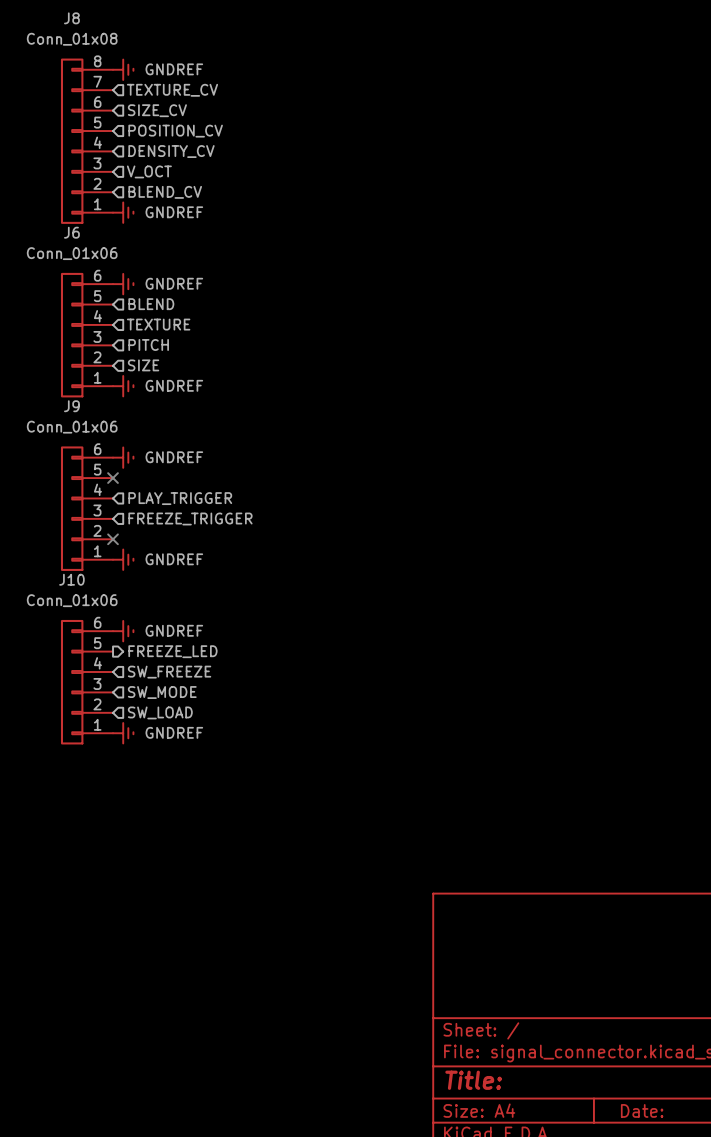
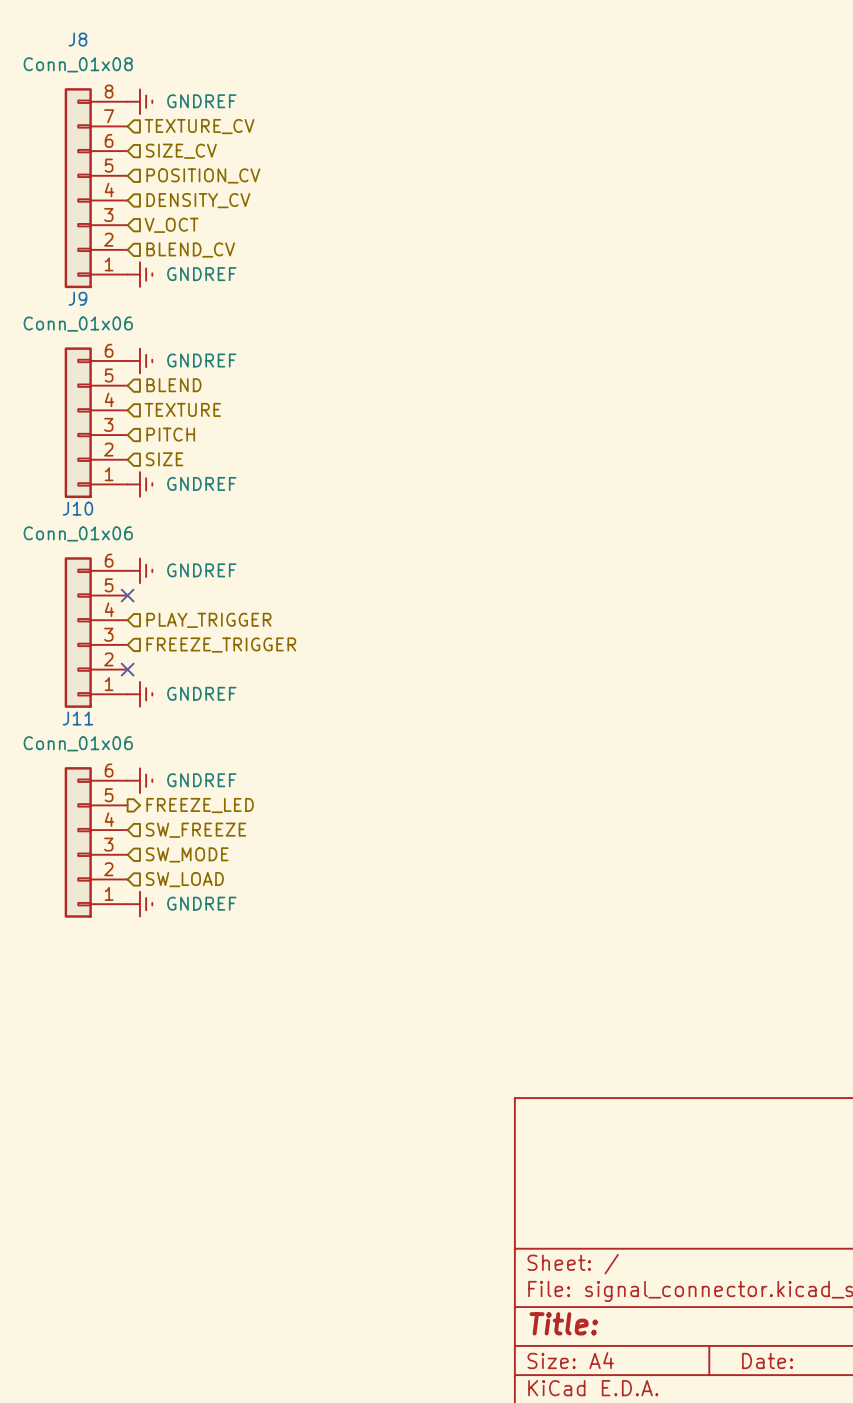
J6 name: J6 (71, 232) -> J9 (77, 298)
J9 name: J9 (71, 406) -> J10 (77, 508)
J10 name: J10 (71, 579) -> J11 (77, 718)

